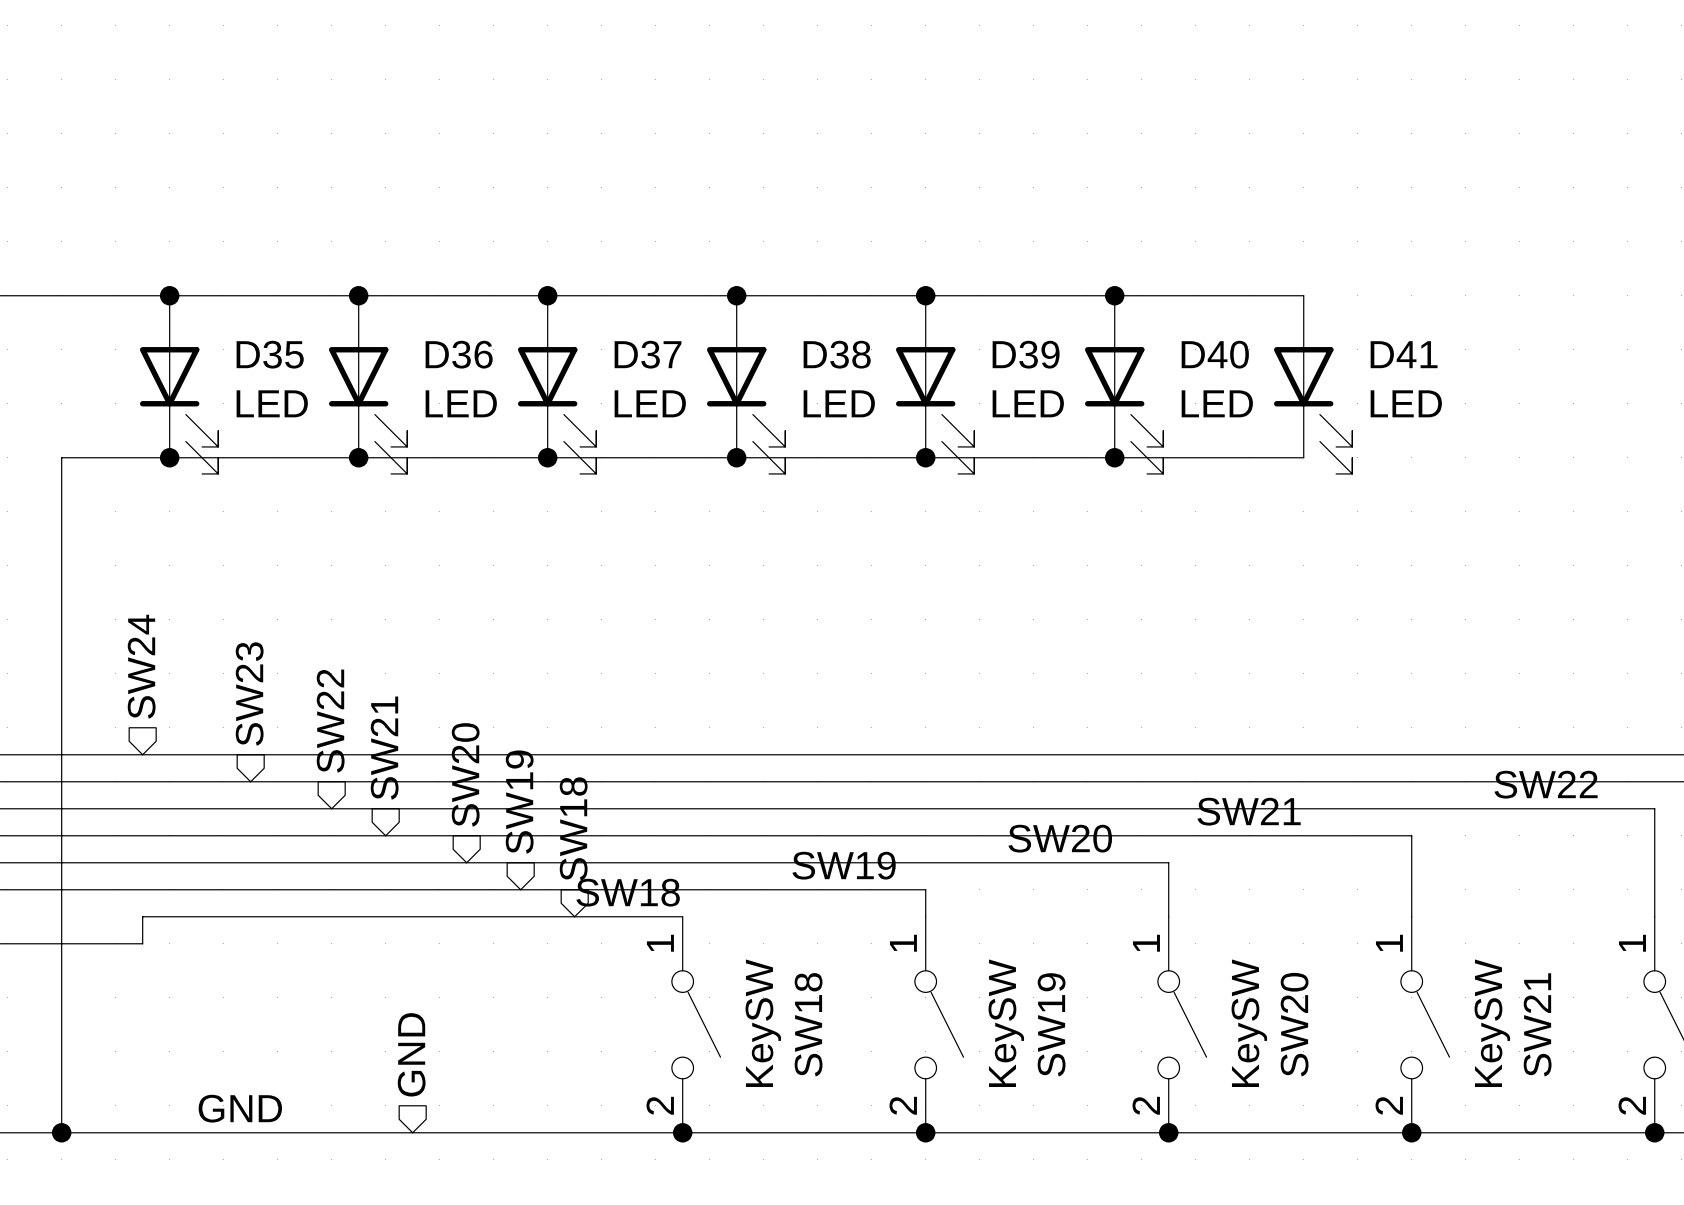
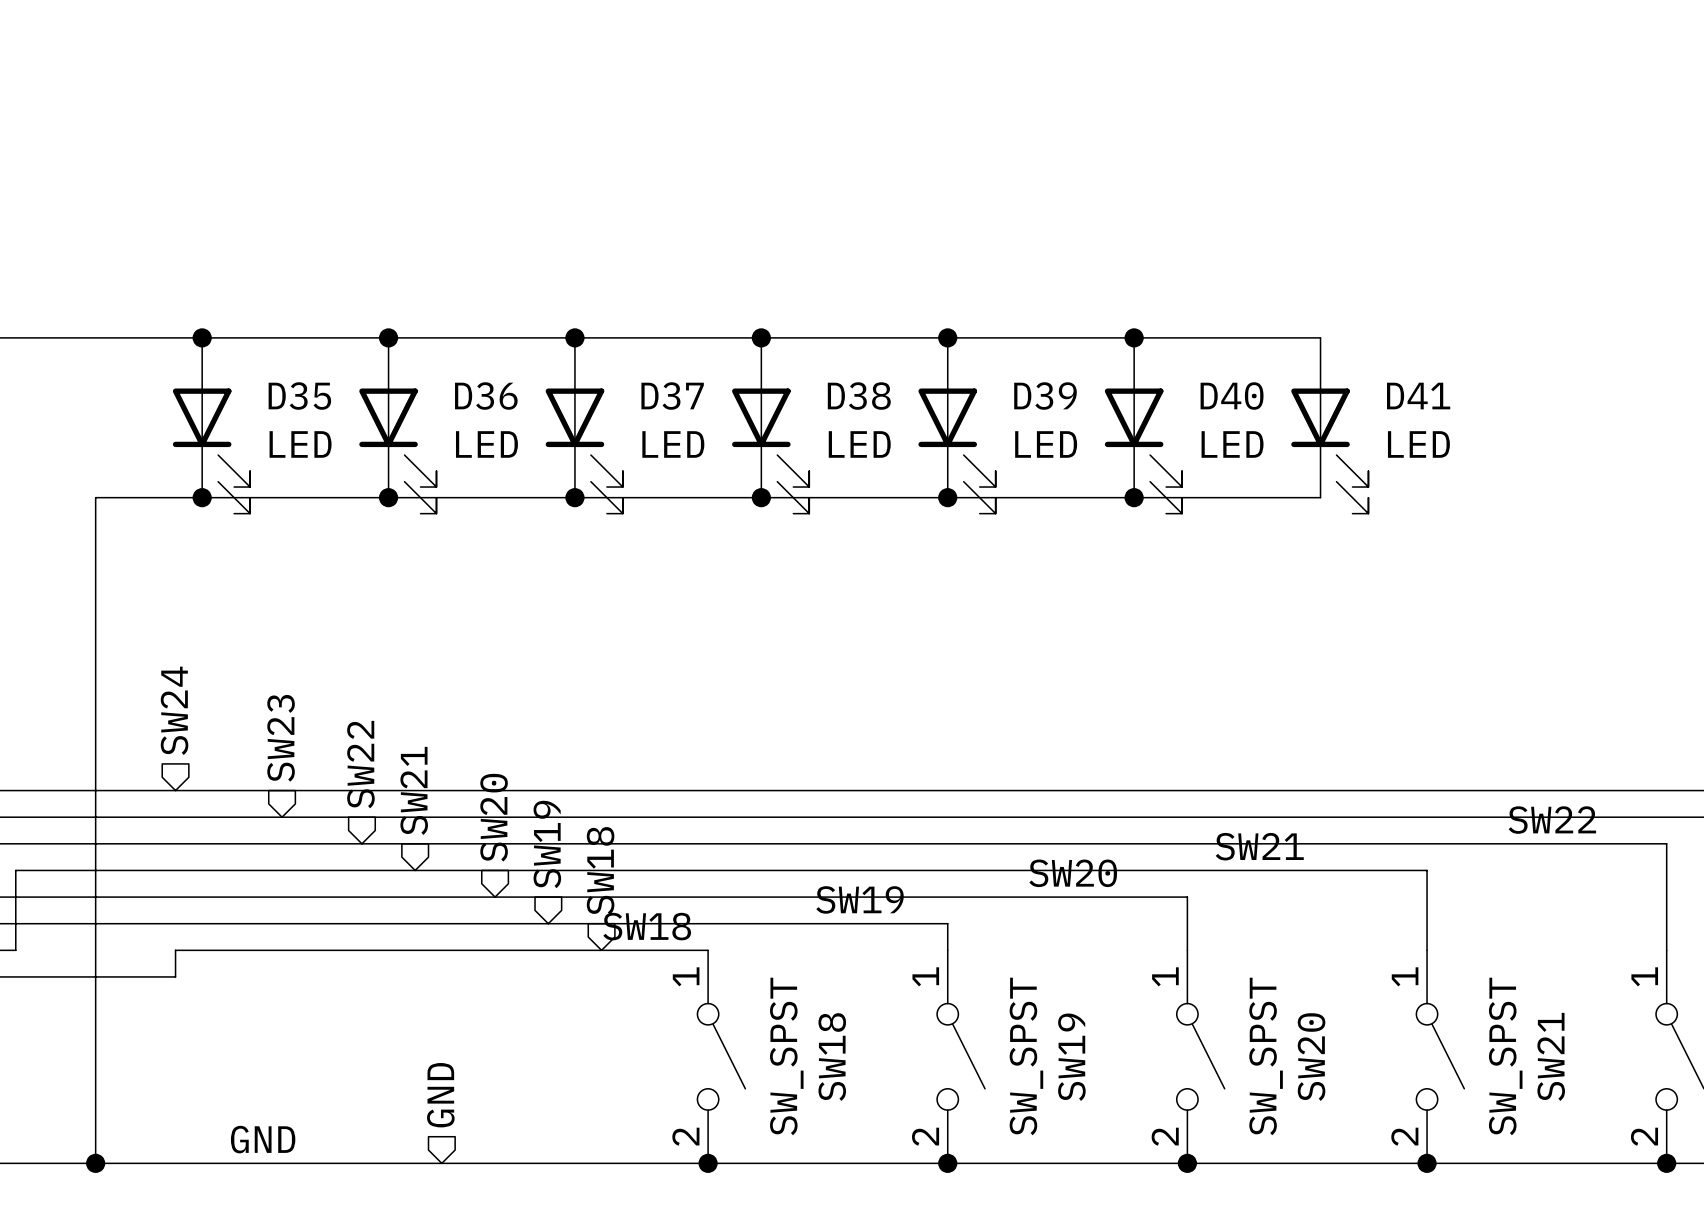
SW18 value: KeySW (763, 1023) -> SW_SPST (786, 1056)
SW19 value: KeySW (1006, 1023) -> SW_SPST (1026, 1056)
SW20 value: KeySW (1249, 1023) -> SW_SPST (1266, 1056)
SW21 value: KeySW (1492, 1023) -> SW_SPST (1505, 1056)

